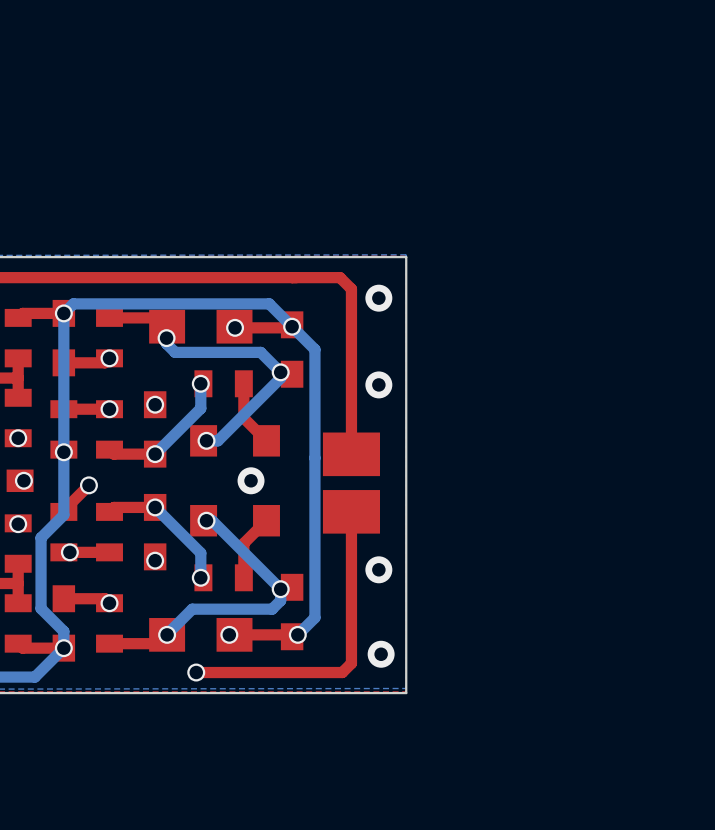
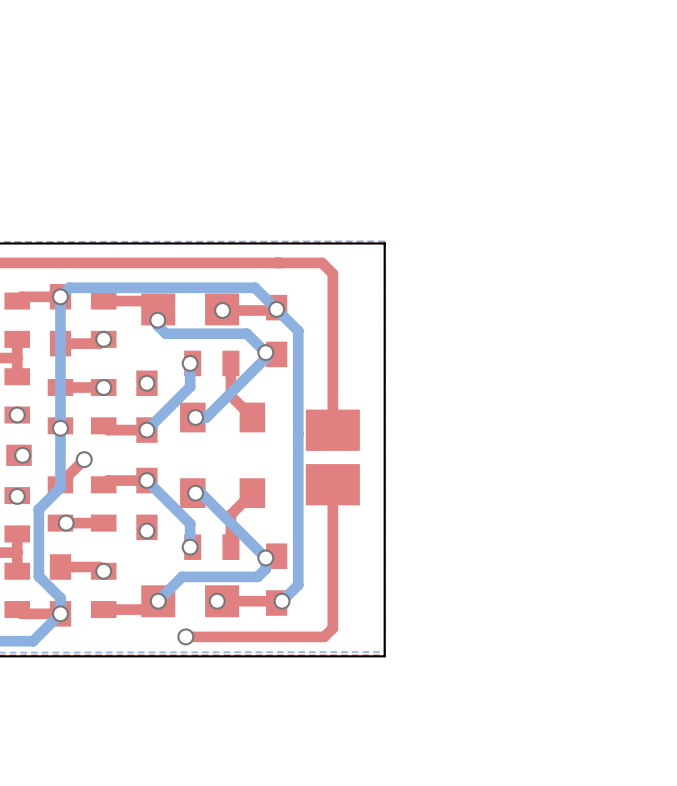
via: (378, 298) -> none
via: (378, 384) -> none
via: (251, 480) -> none
via: (378, 569) -> none
via: (381, 654) -> none

